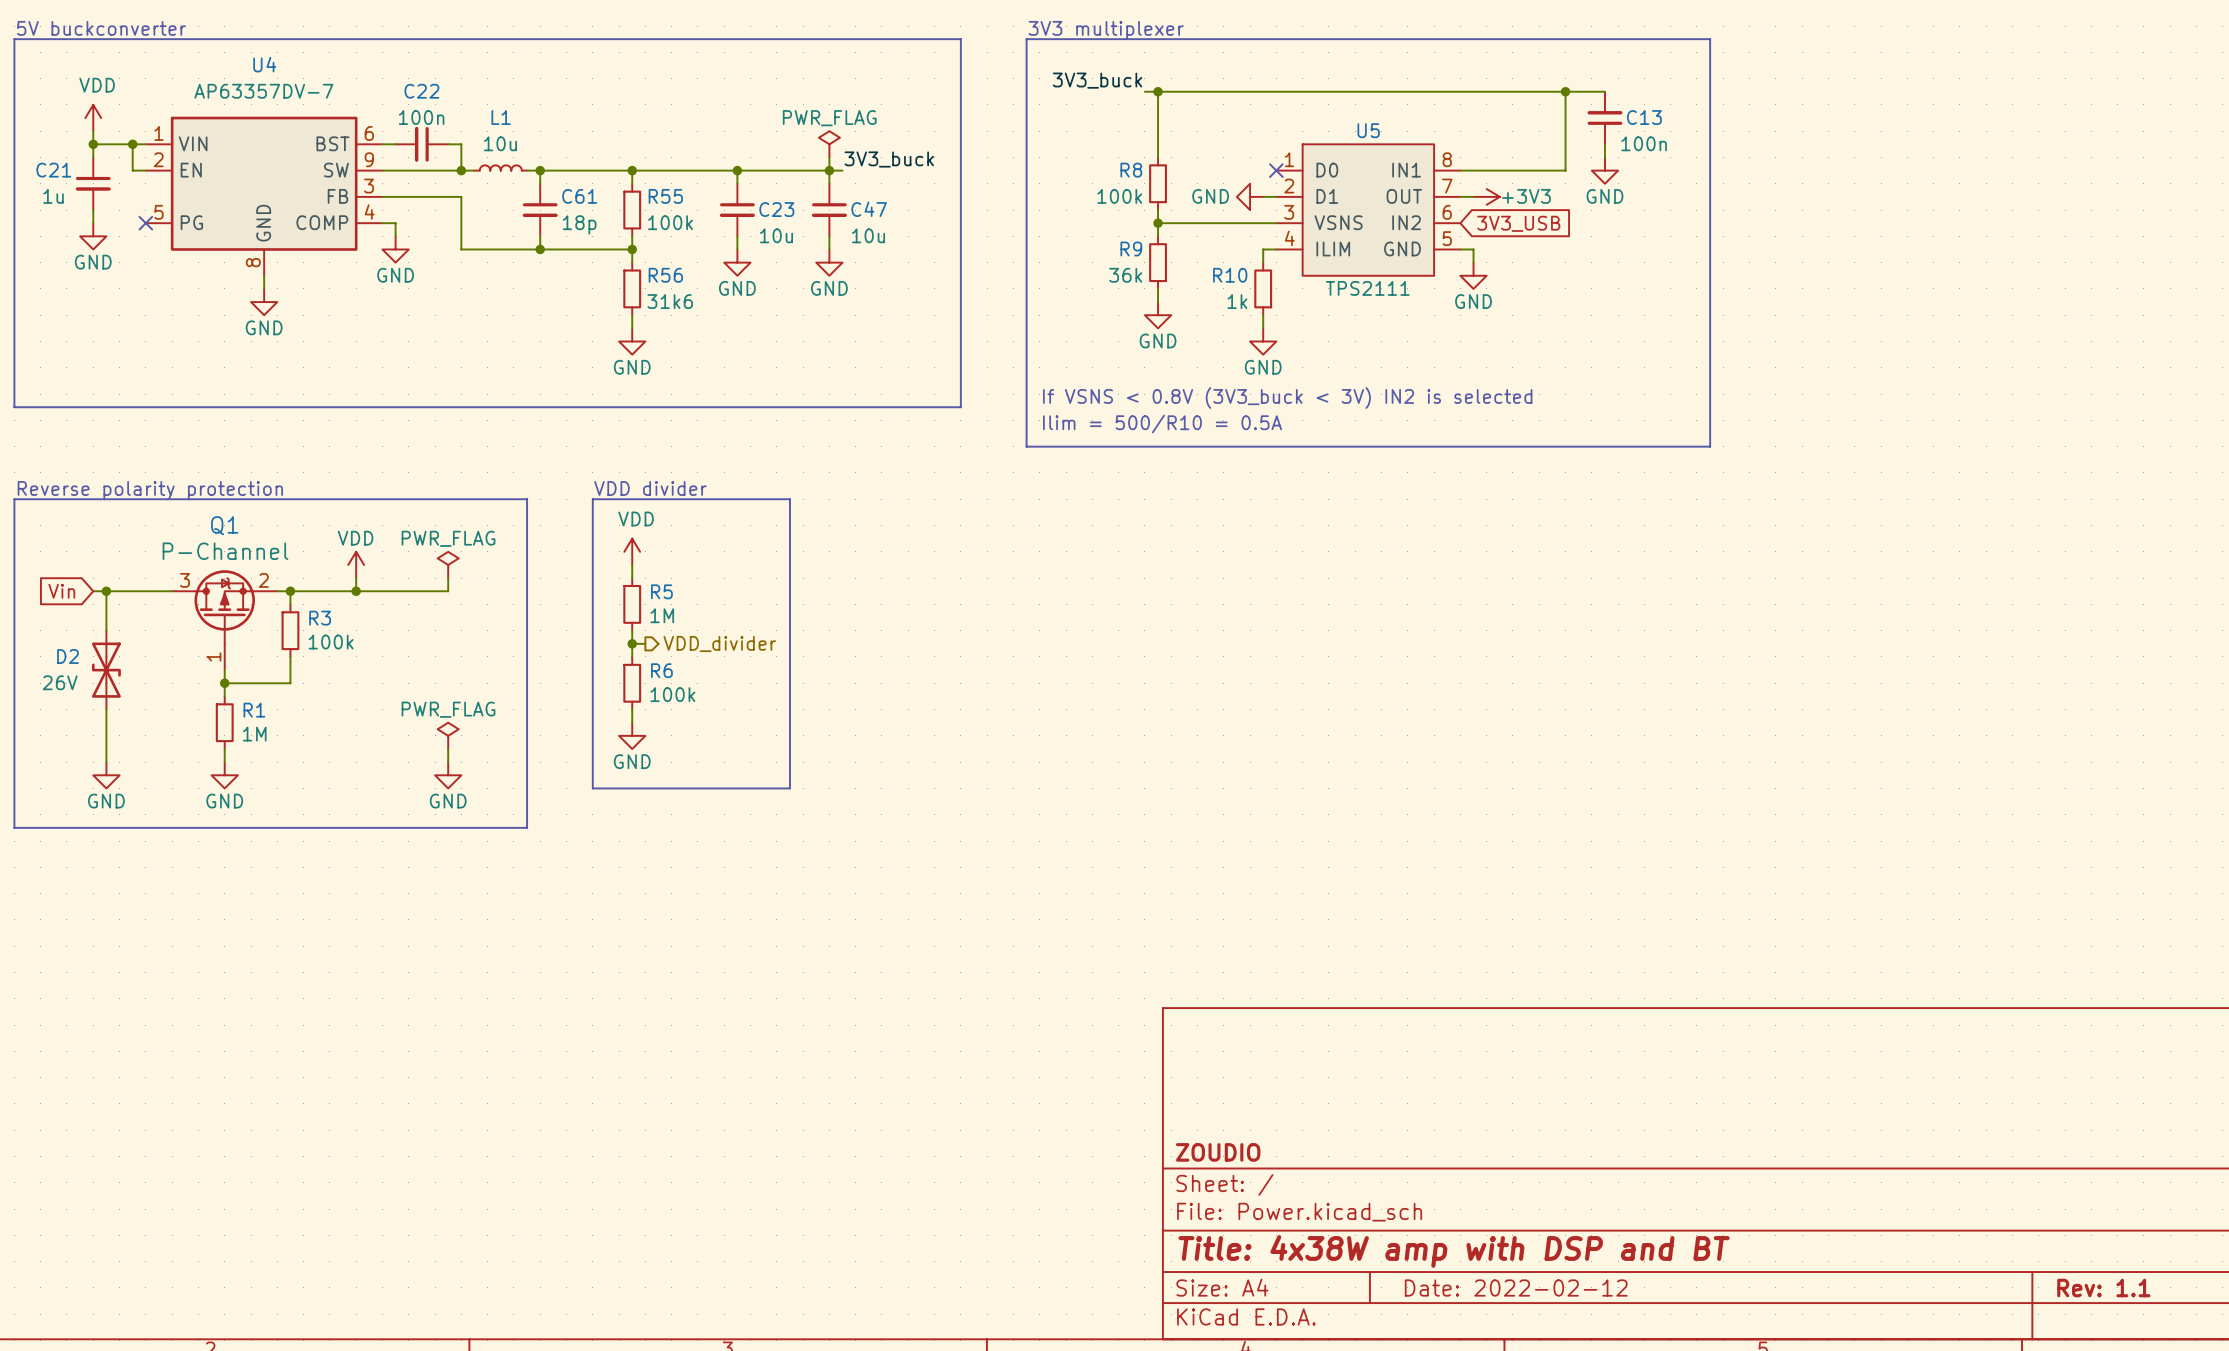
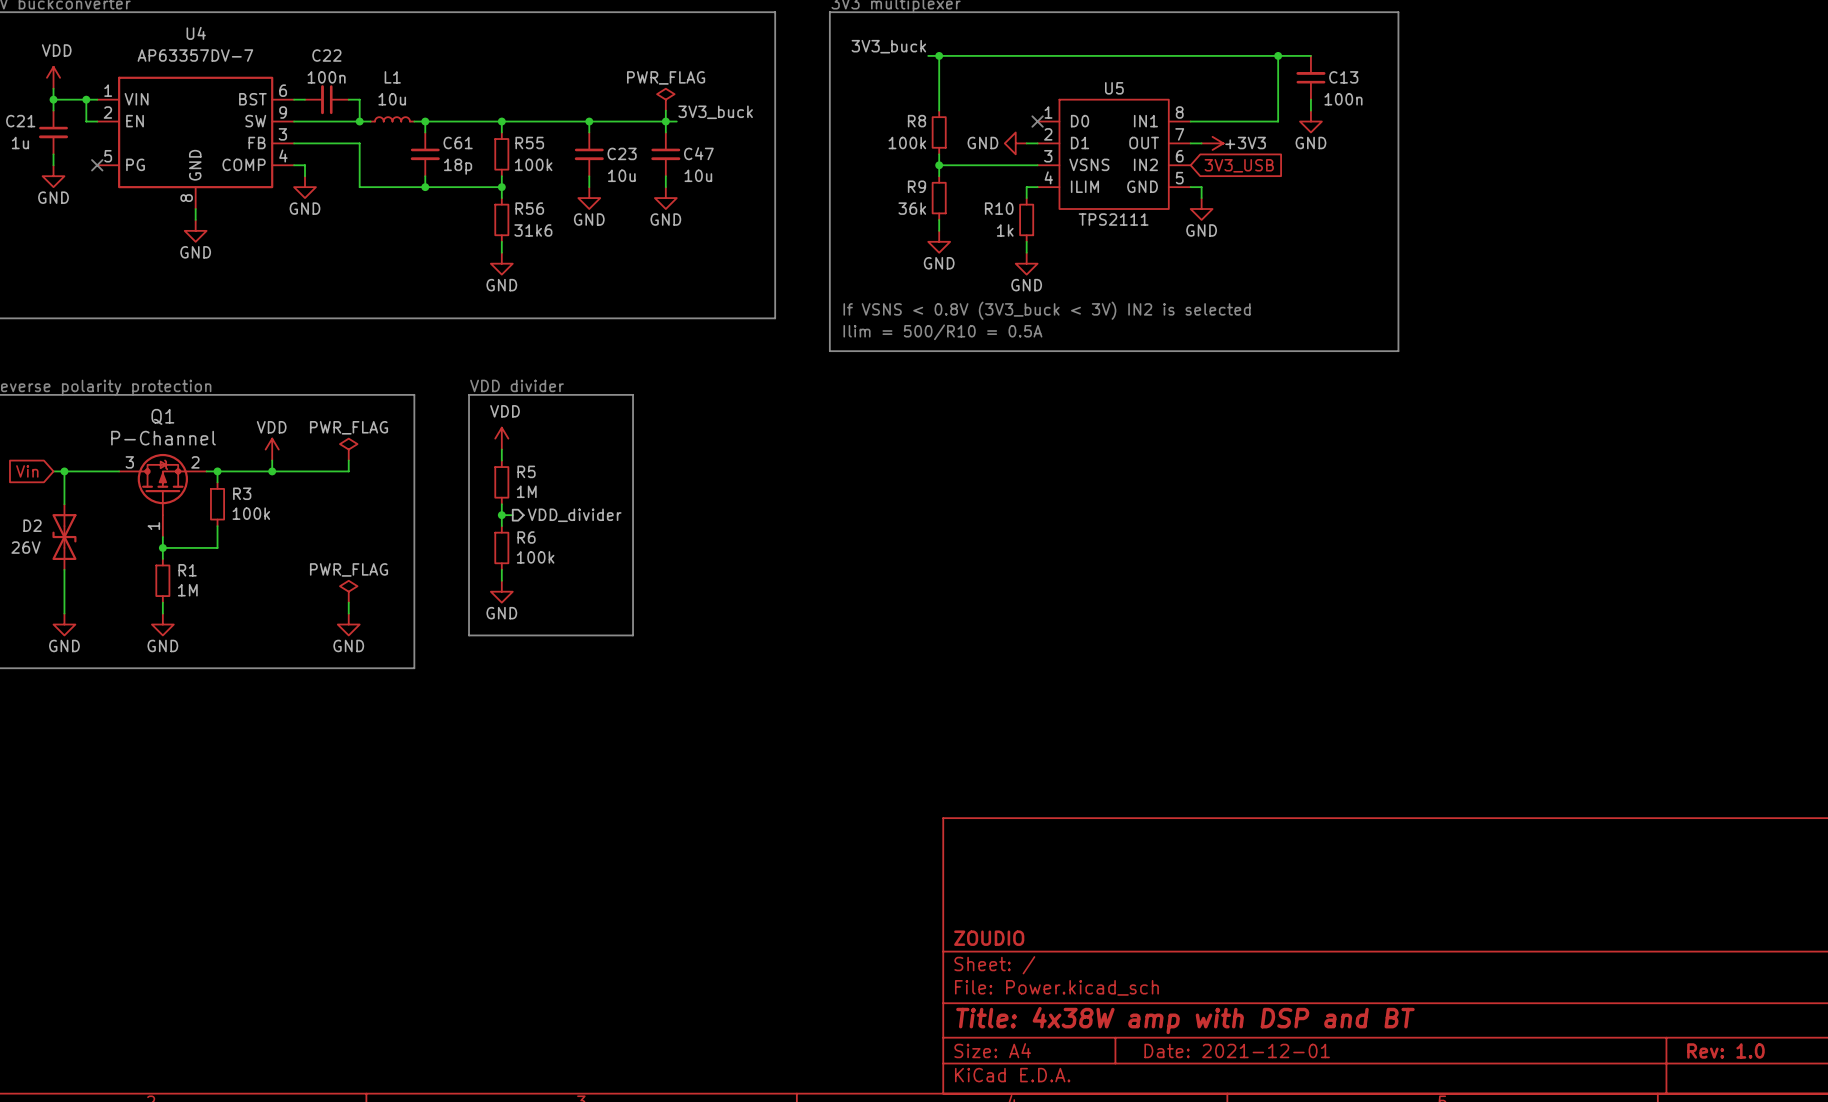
title block: Date: 2022-02-12 (1516, 1288) -> Date: 2021-12-01 (1237, 1050)
title block: Rev: 1.1 (2103, 1288) -> Rev: 1.0 (1725, 1050)

